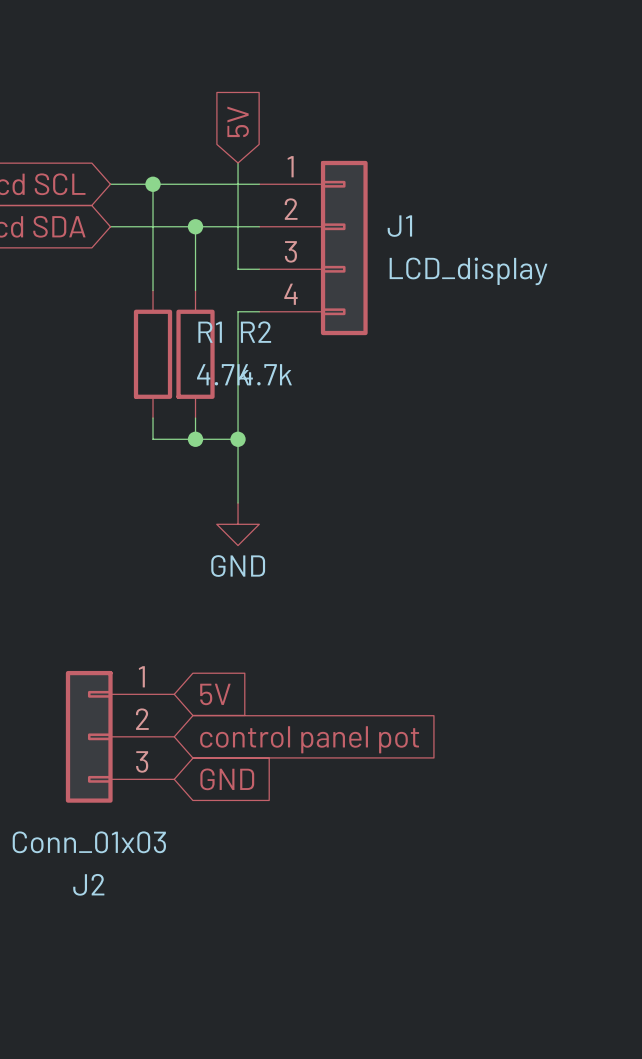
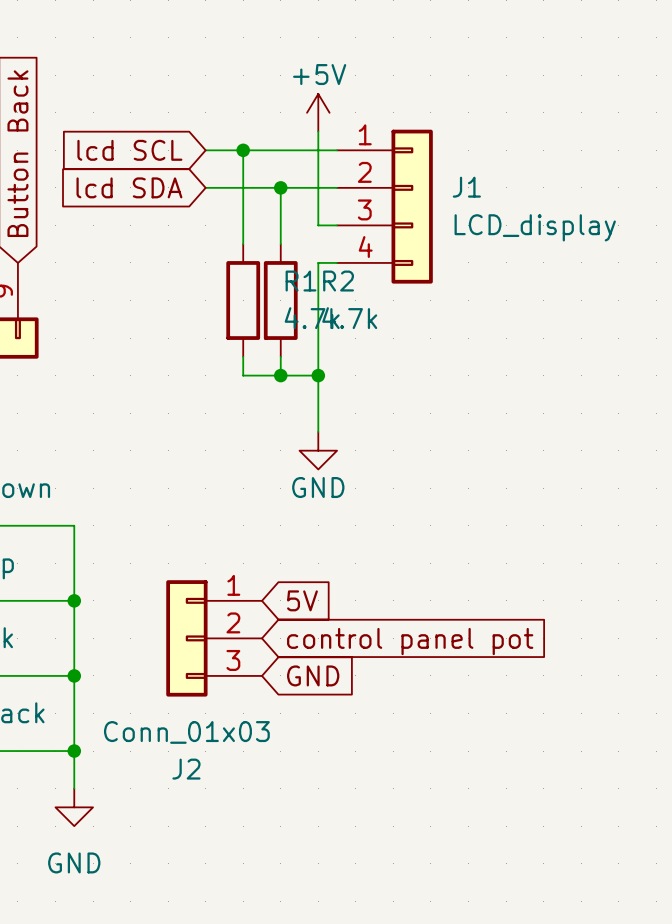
global label: 5V (238, 121) -> none
power symbol: none -> +5V (318, 112)

